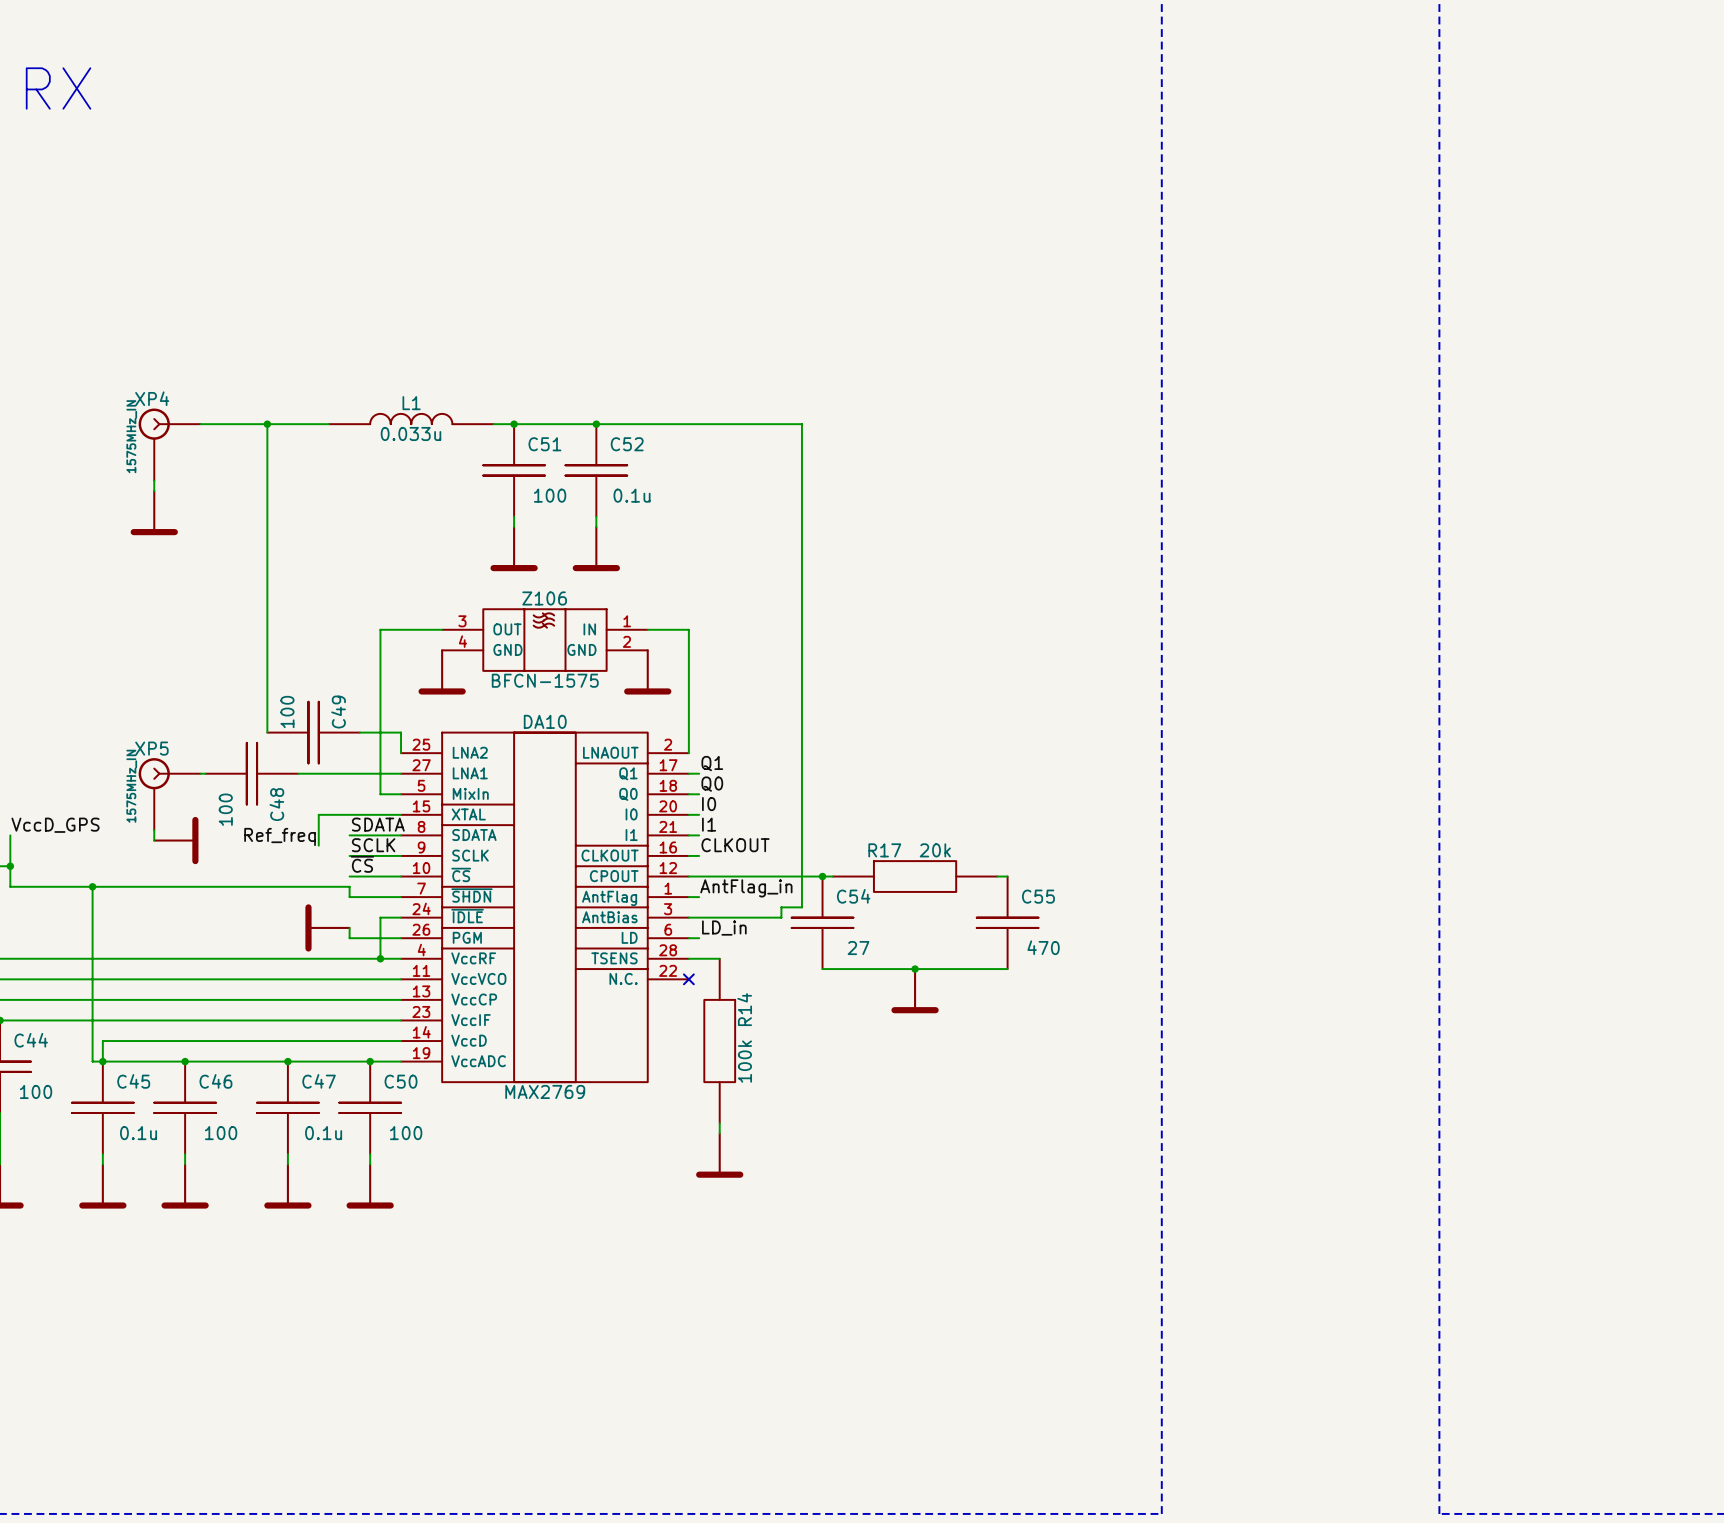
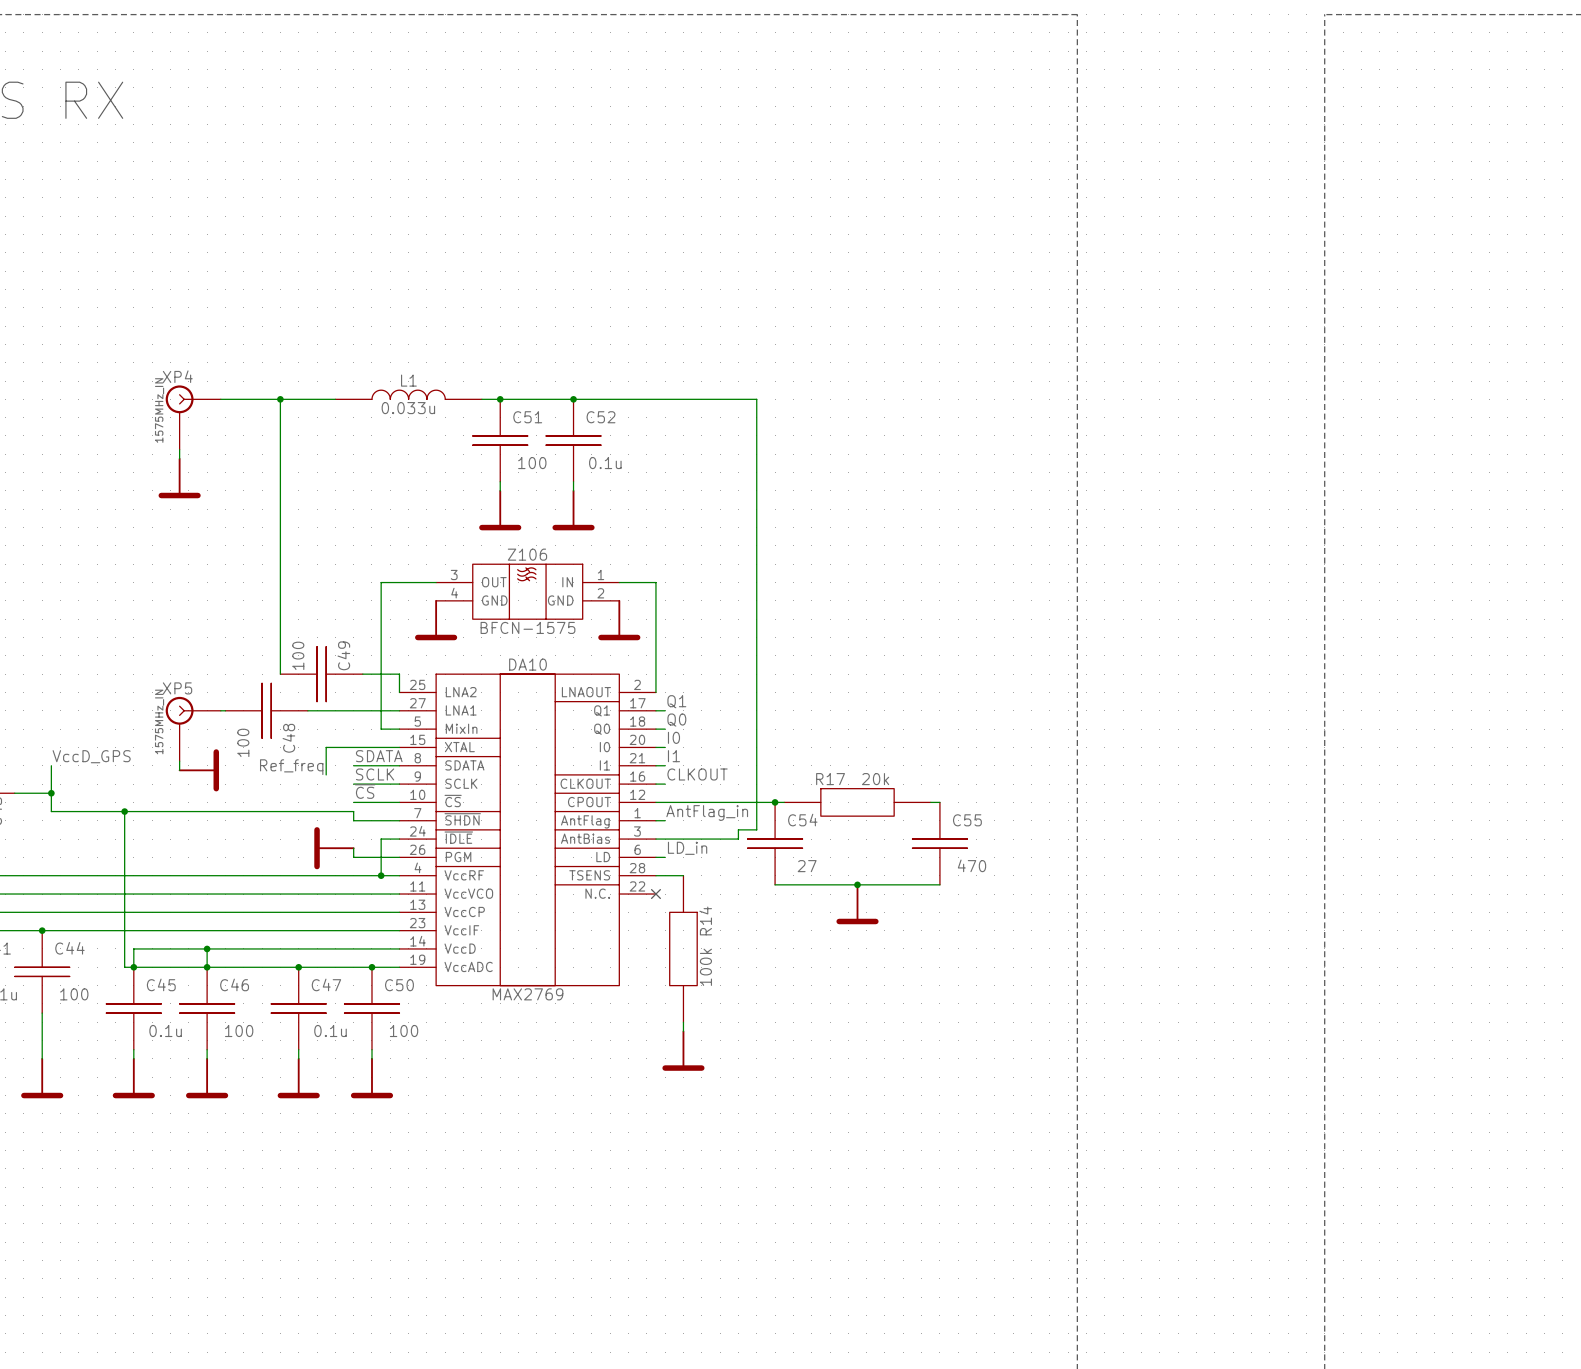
wire: none -> (207, 948) (207, 967)
junction: none -> (207, 948)

